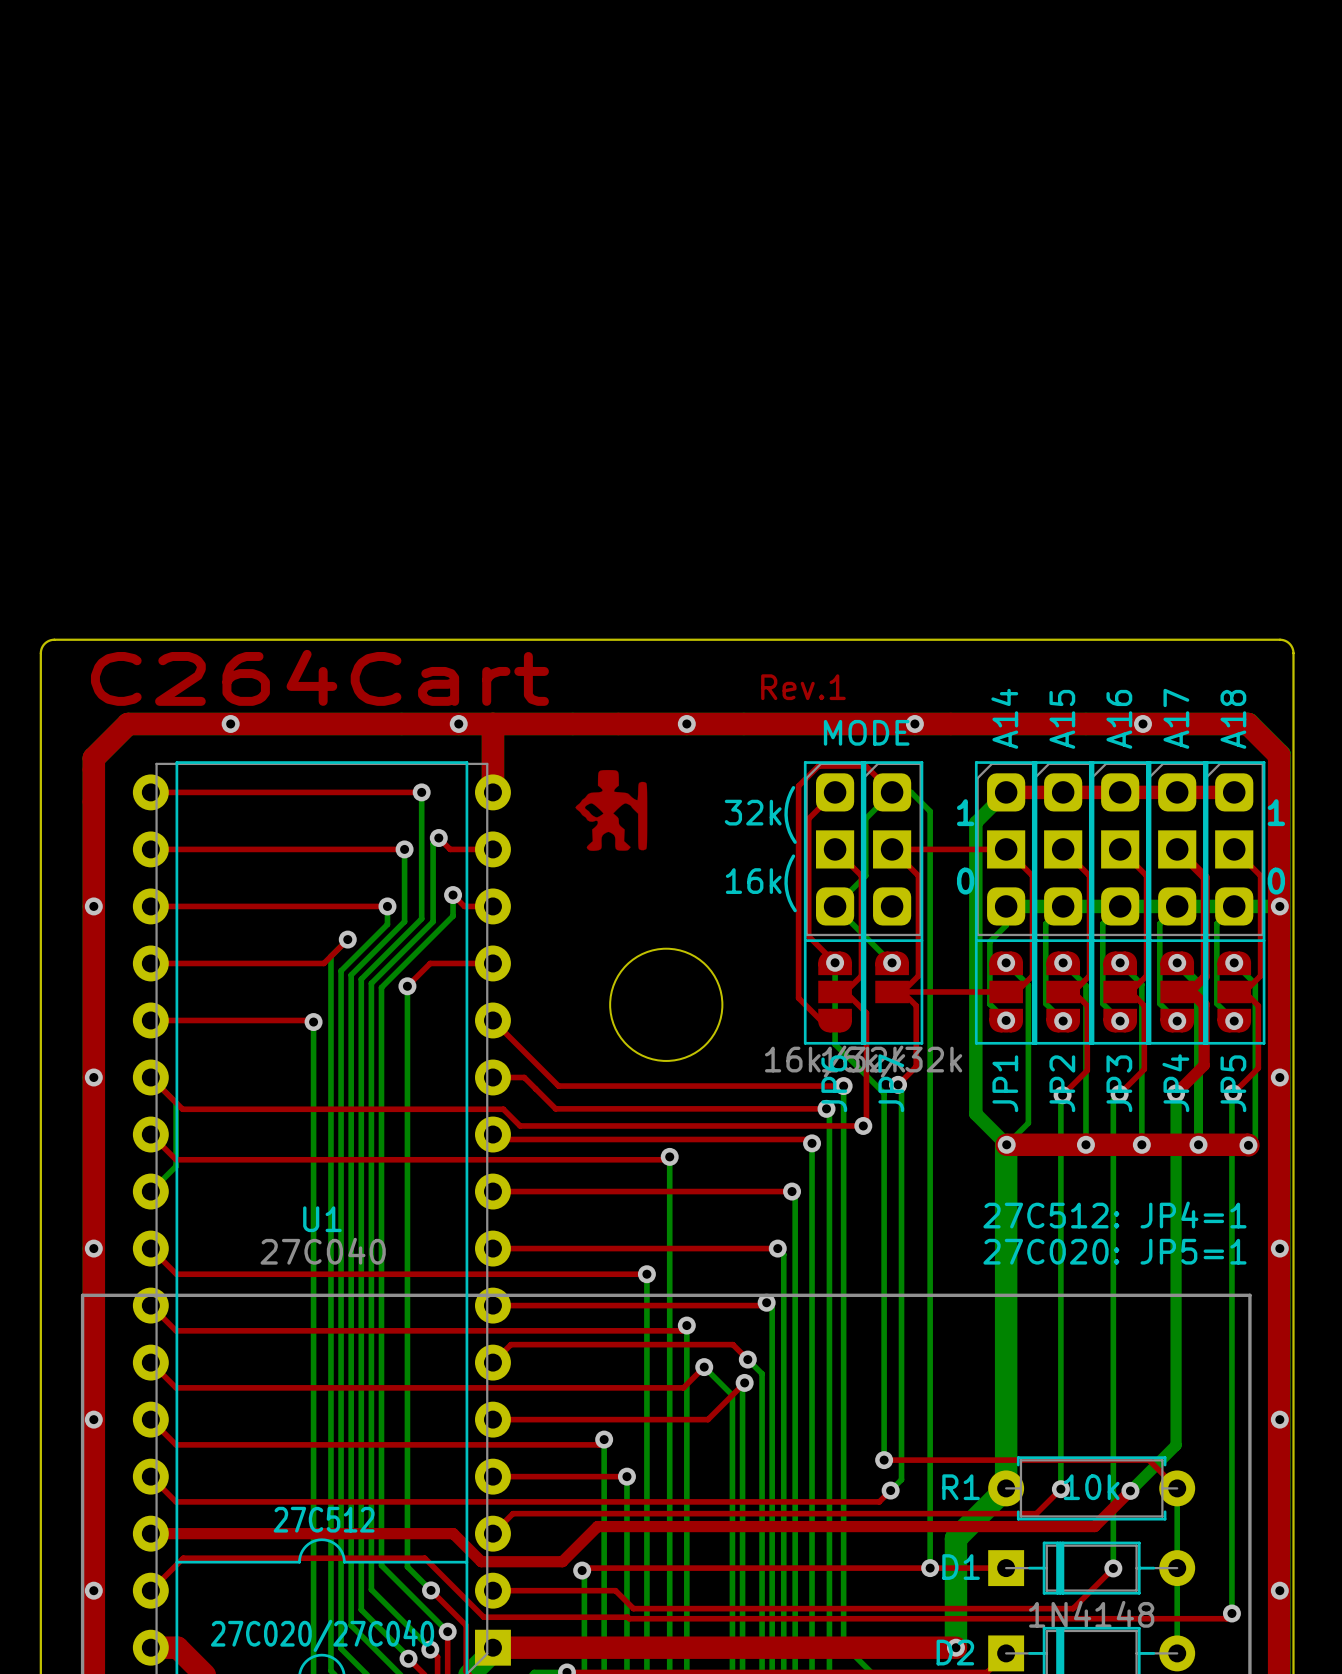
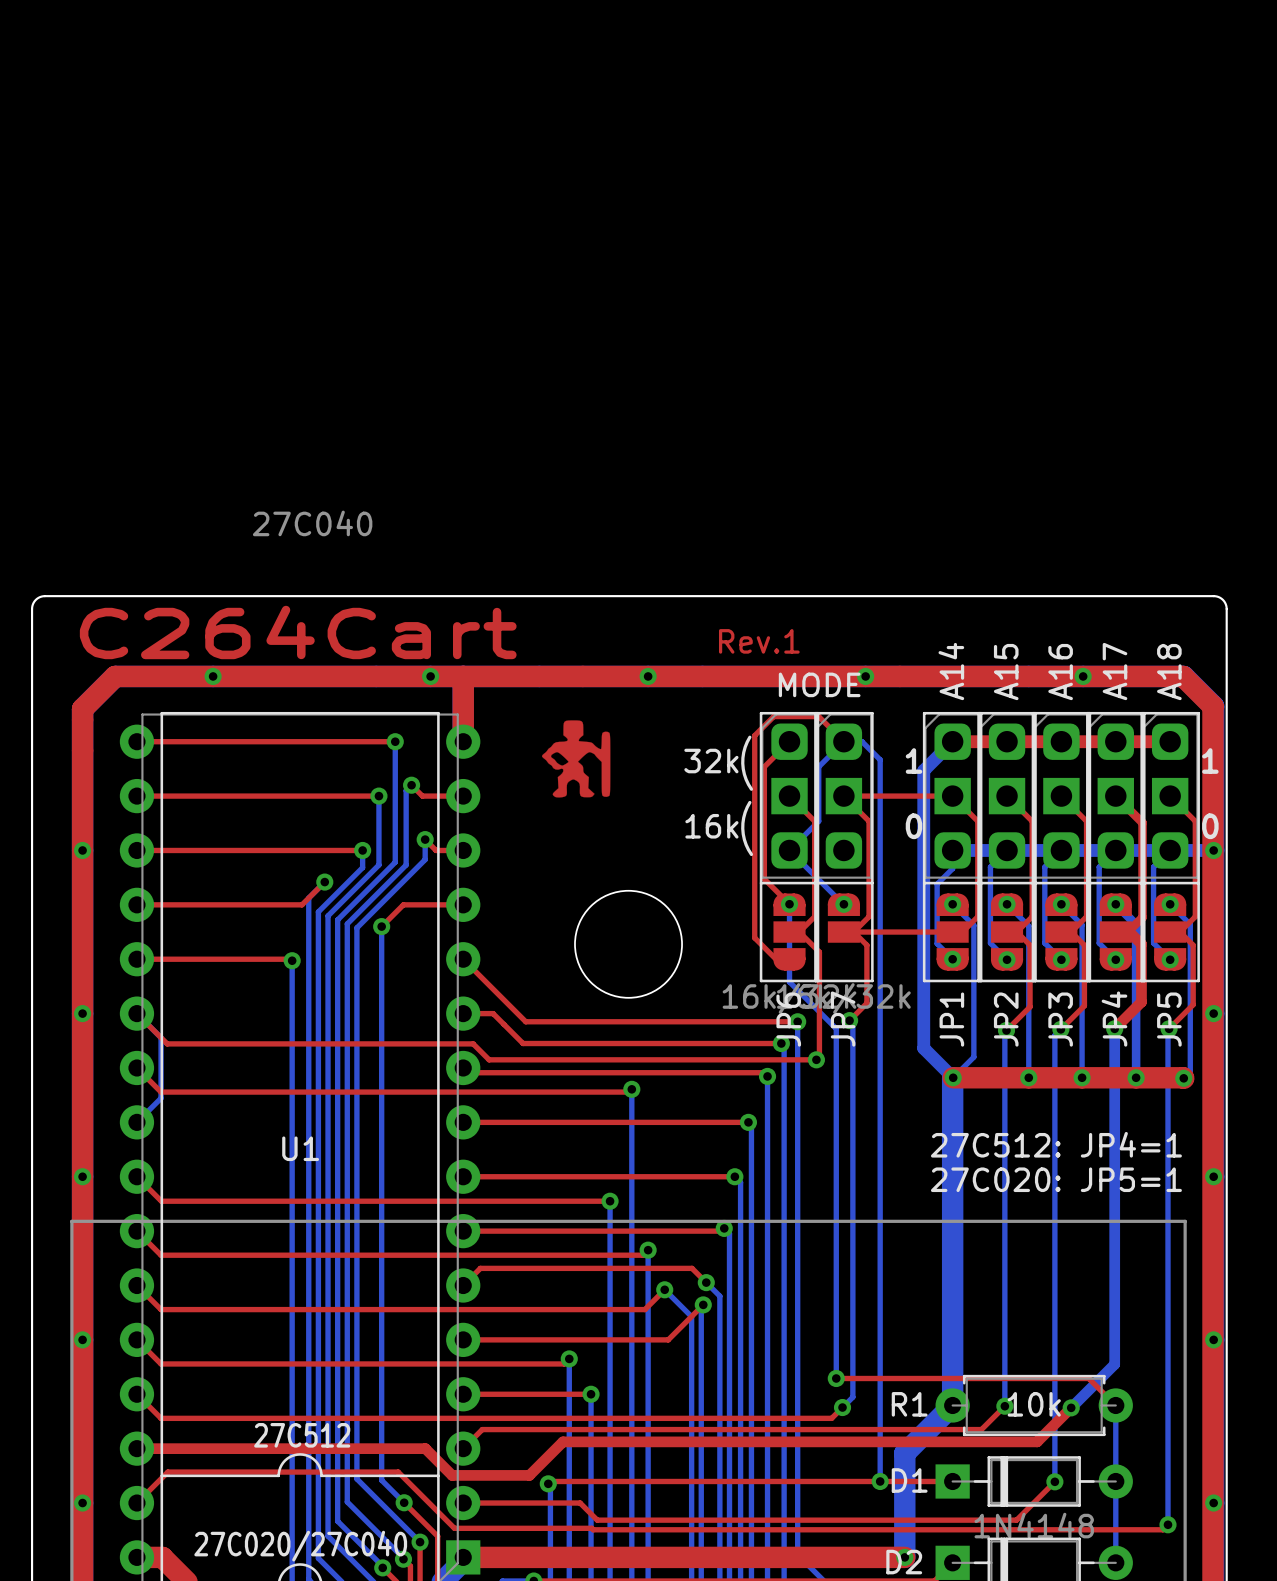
U1 value position: 27C040 (323, 1251) -> 27C040 (312, 523)

